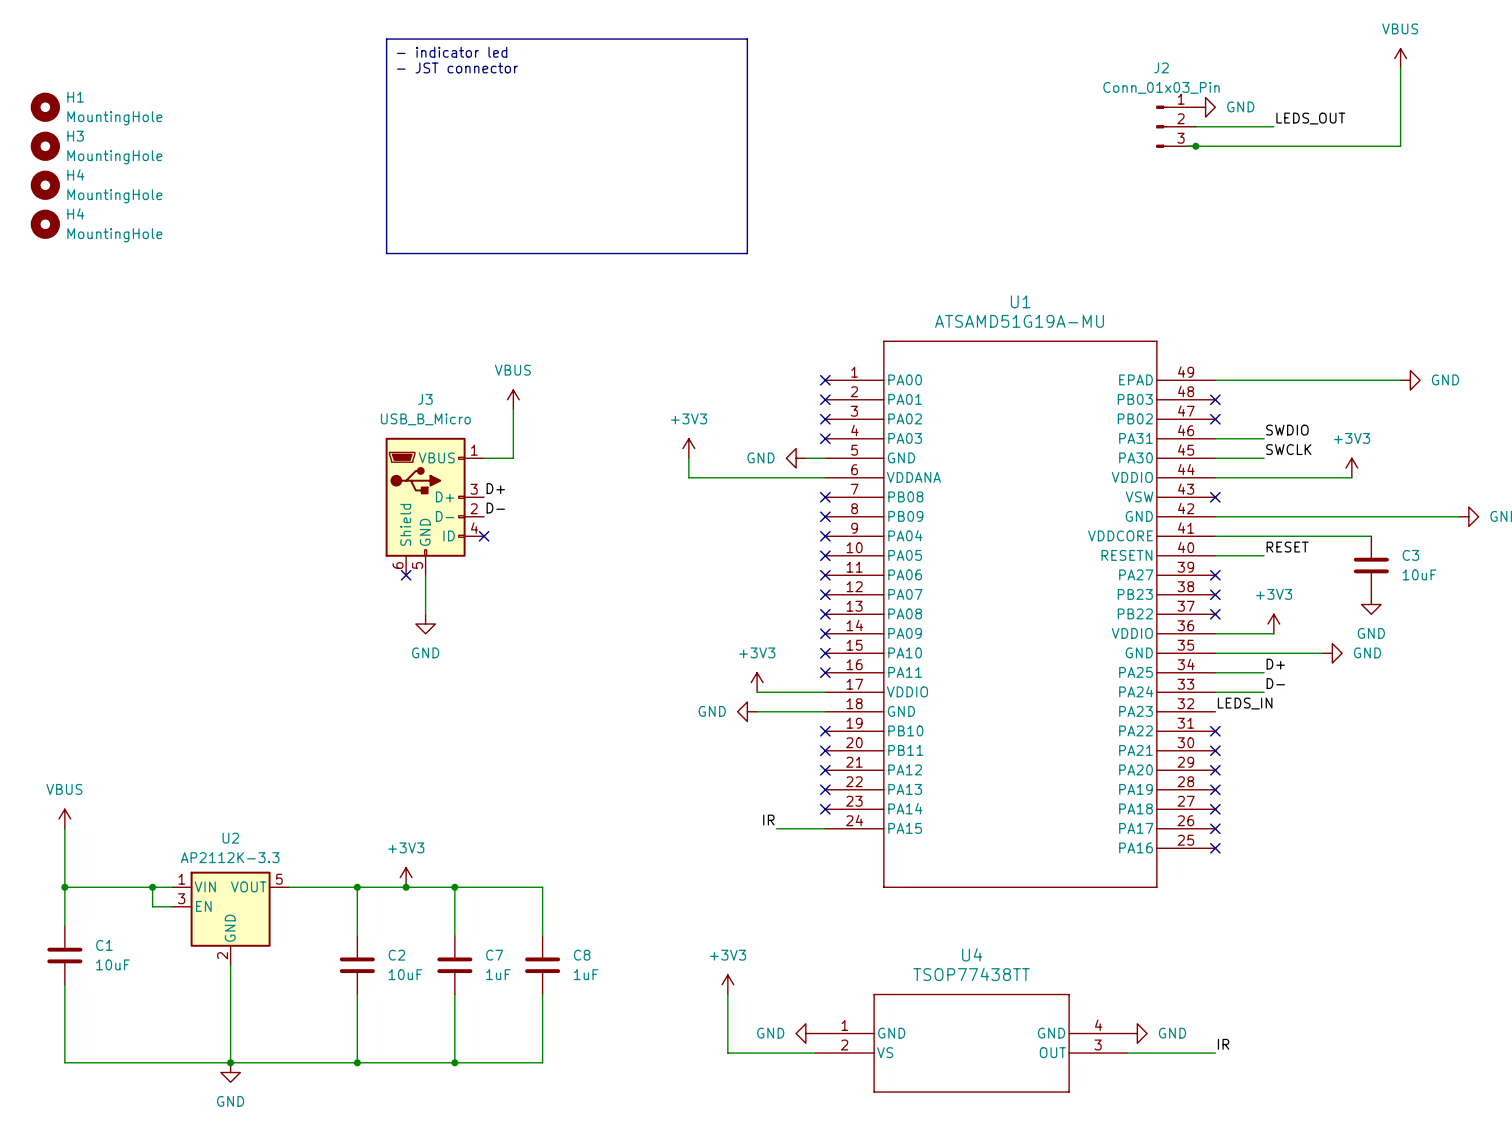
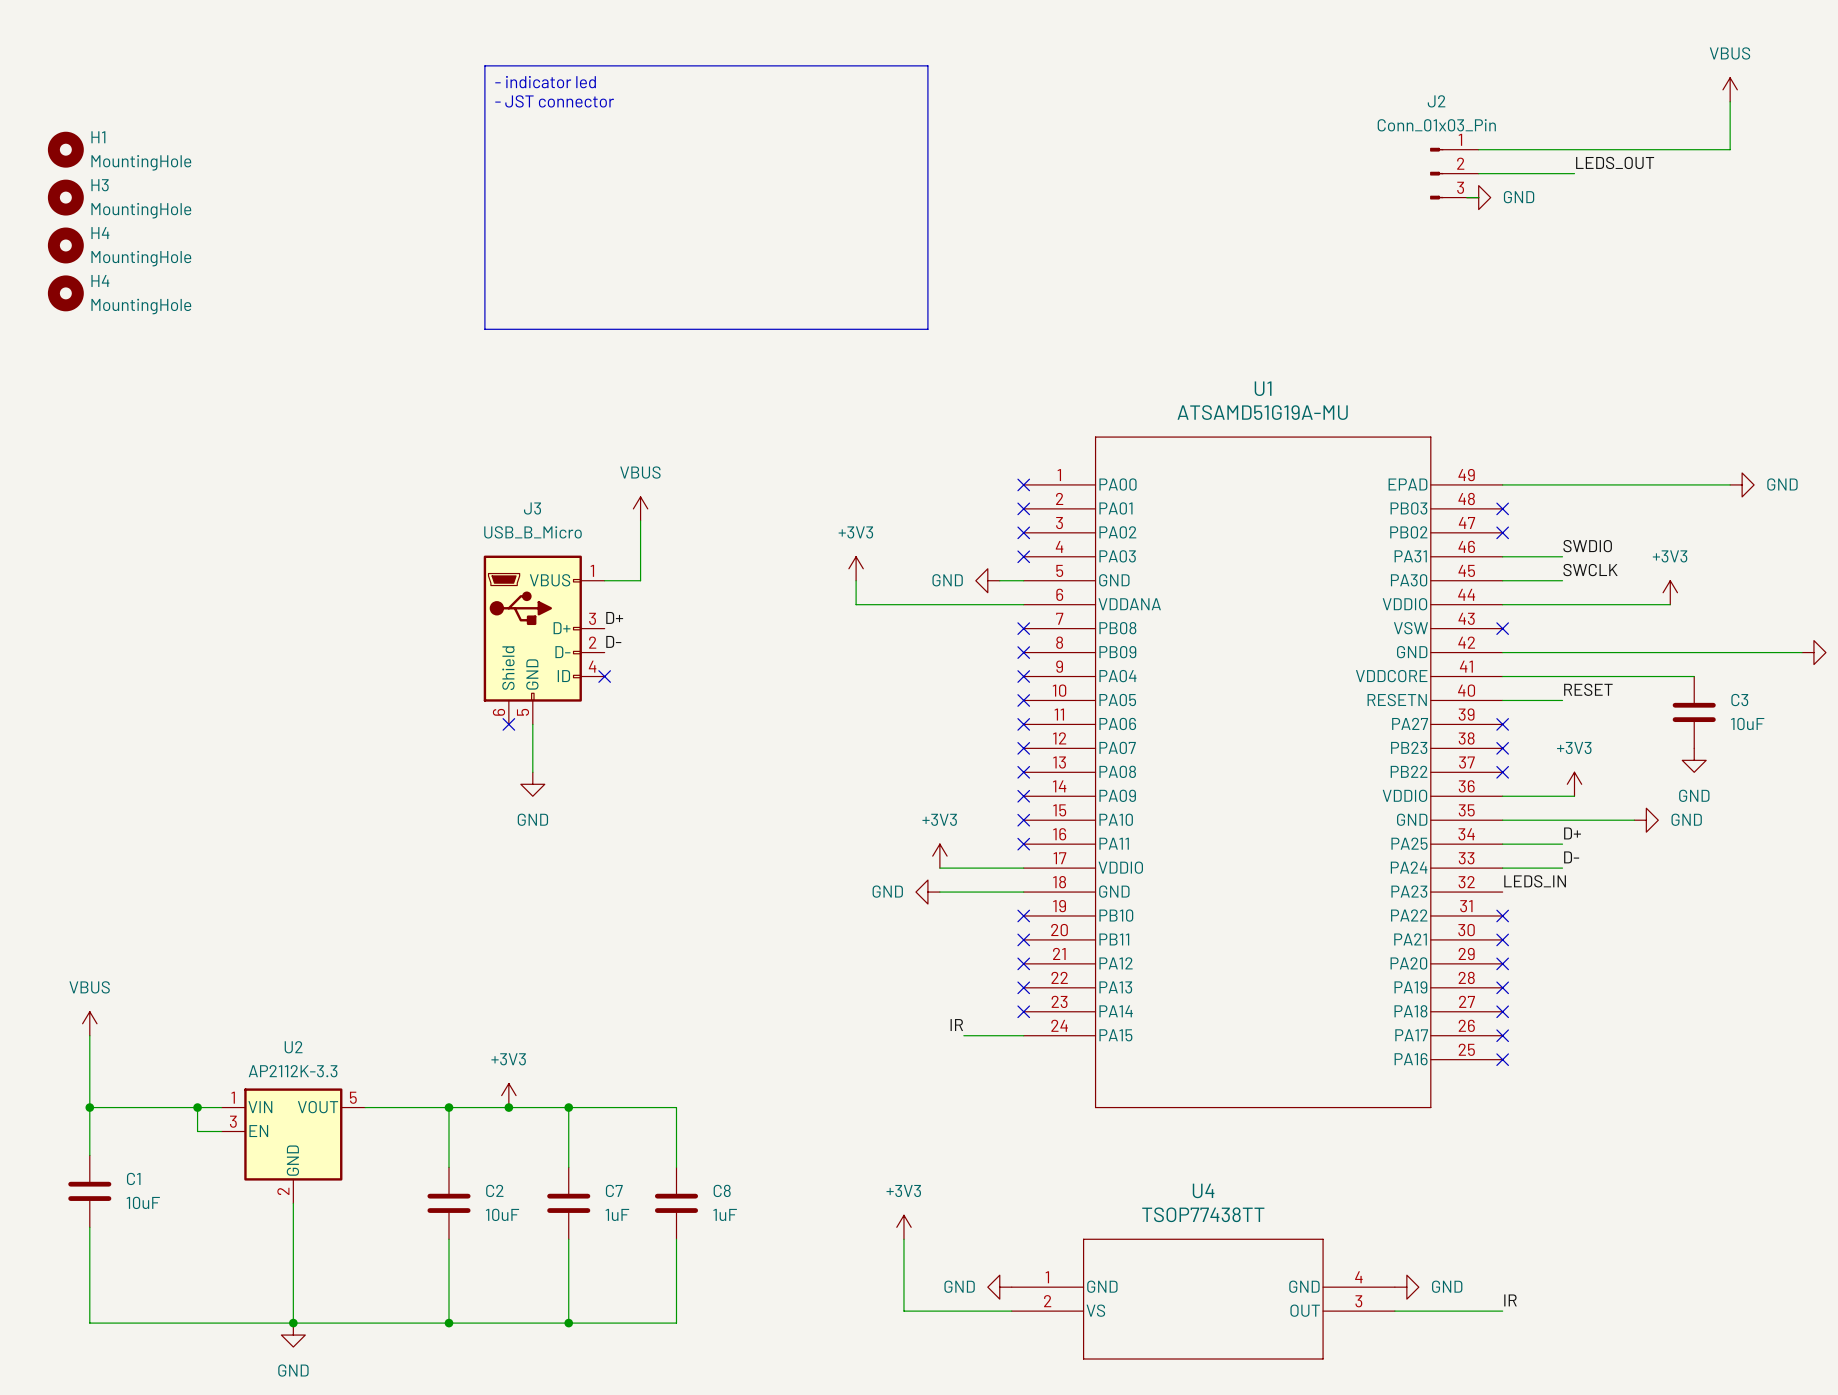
power symbol position: GND (1205, 107) -> GND (1478, 197)
wire: (1400, 107) (1400, 146) (1195, 146) -> (1730, 149) (1478, 149)
junction: (1195, 146) -> none

